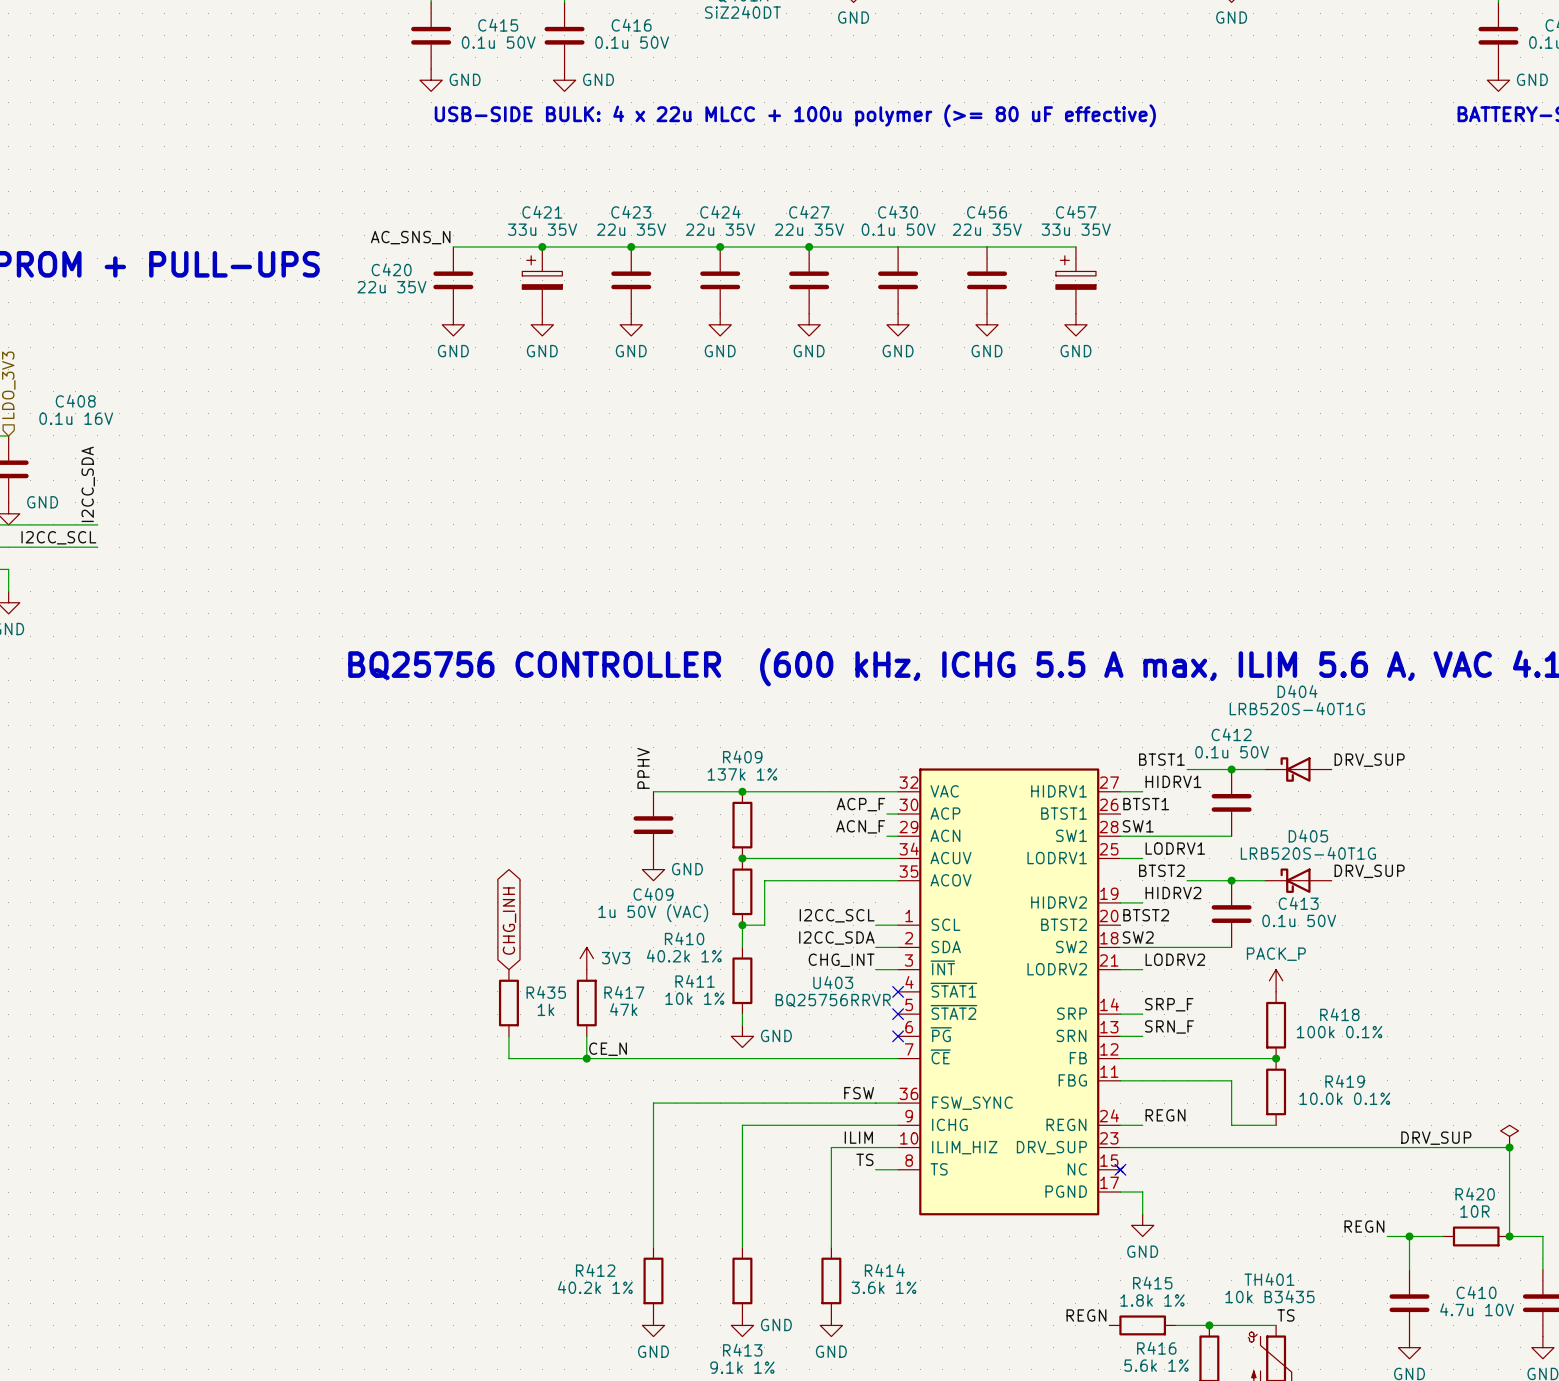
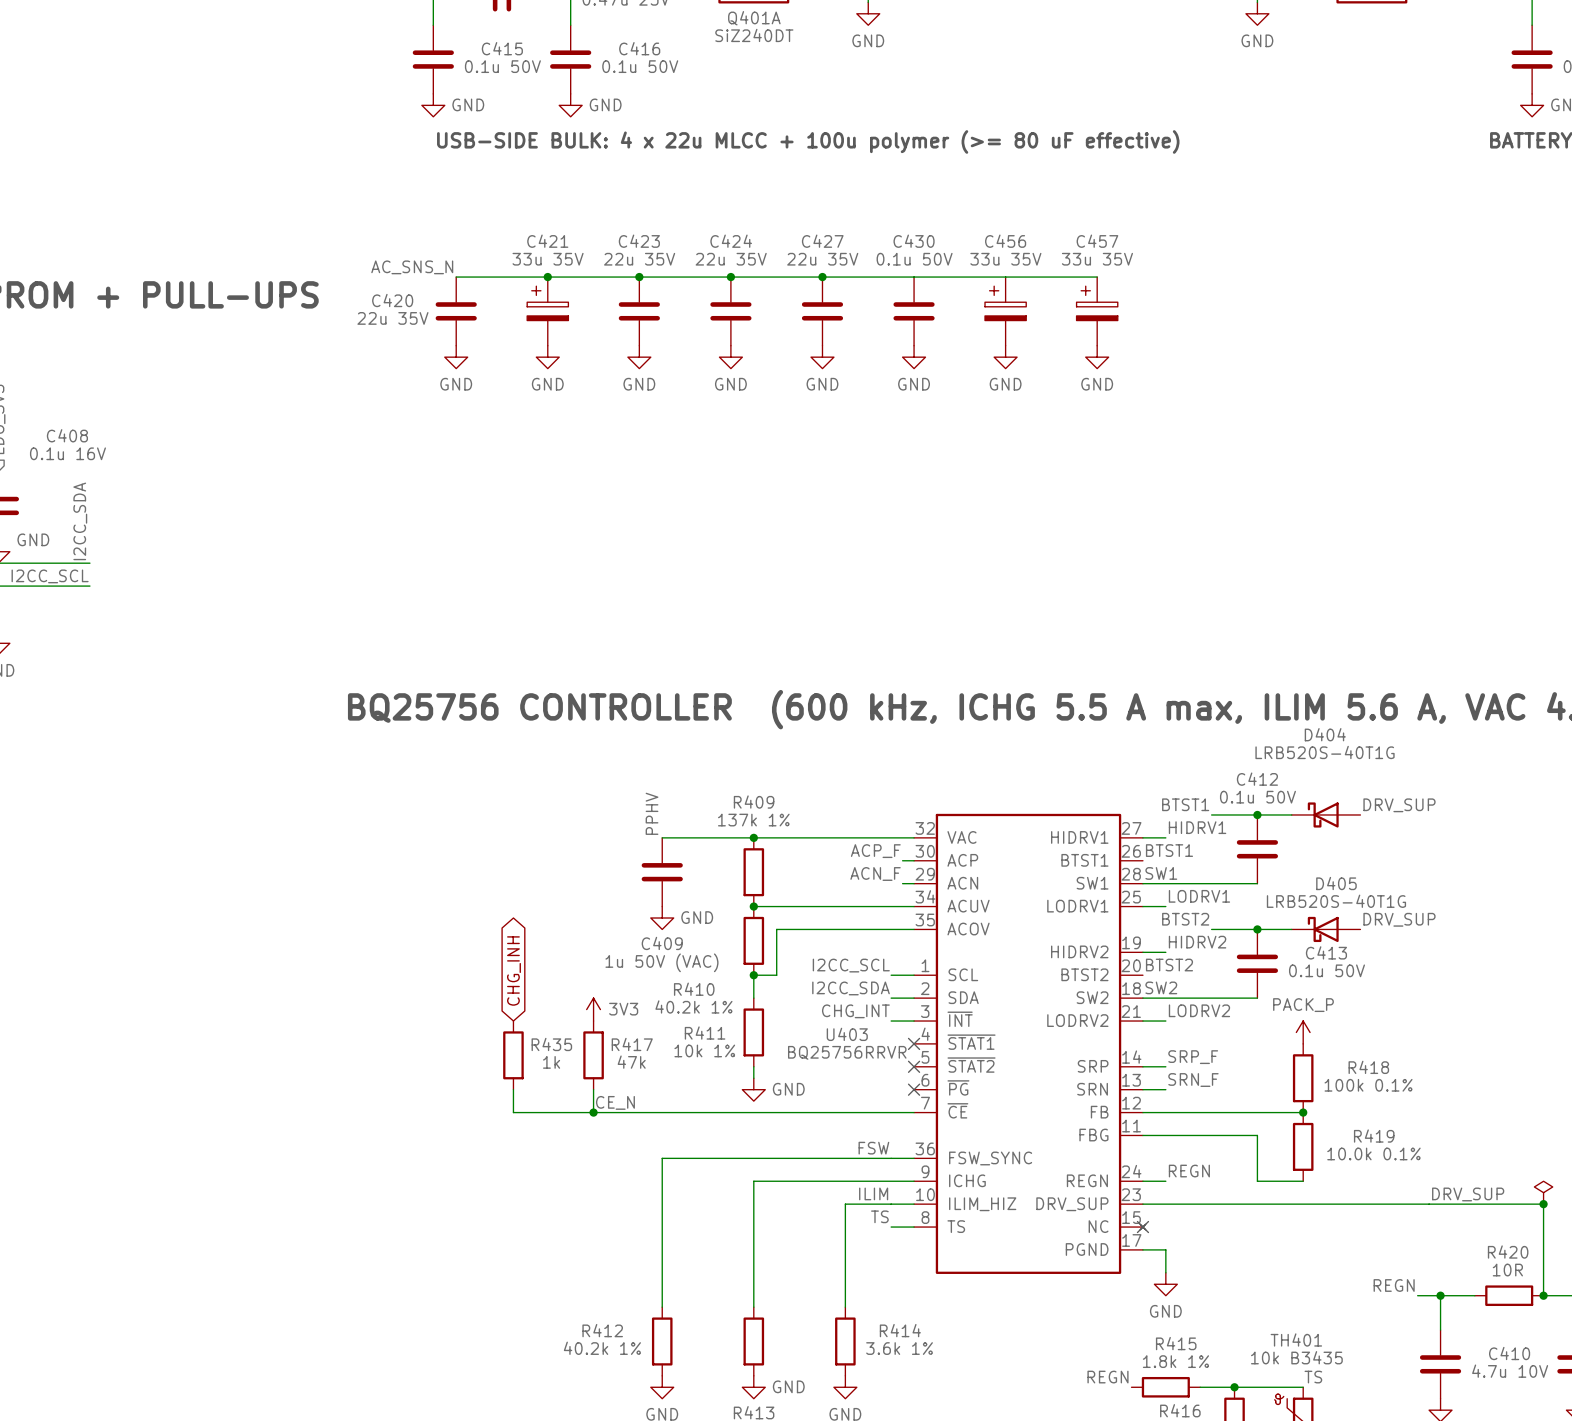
C456 value: 22u 35V (987, 229) -> 33u 35V (1005, 259)
C456 symbol: [967, 246, 1008, 314] -> [985, 277, 1027, 346]

